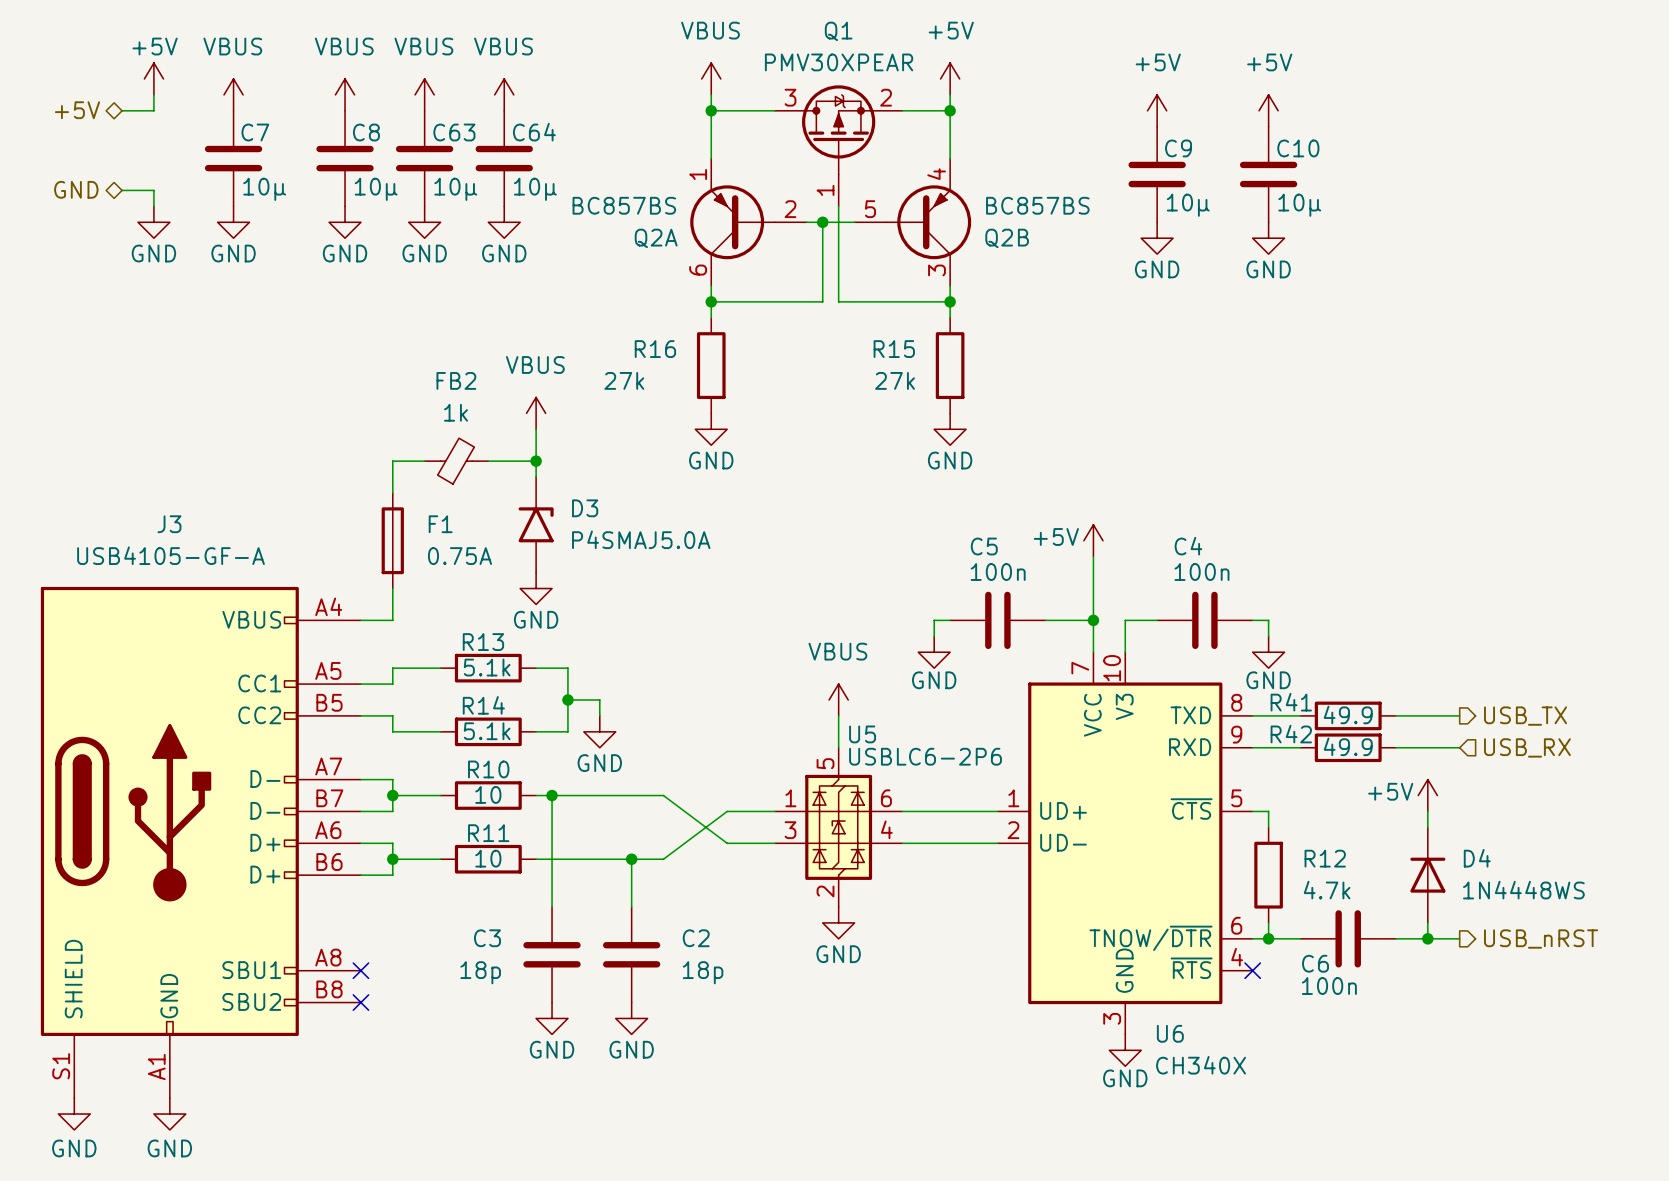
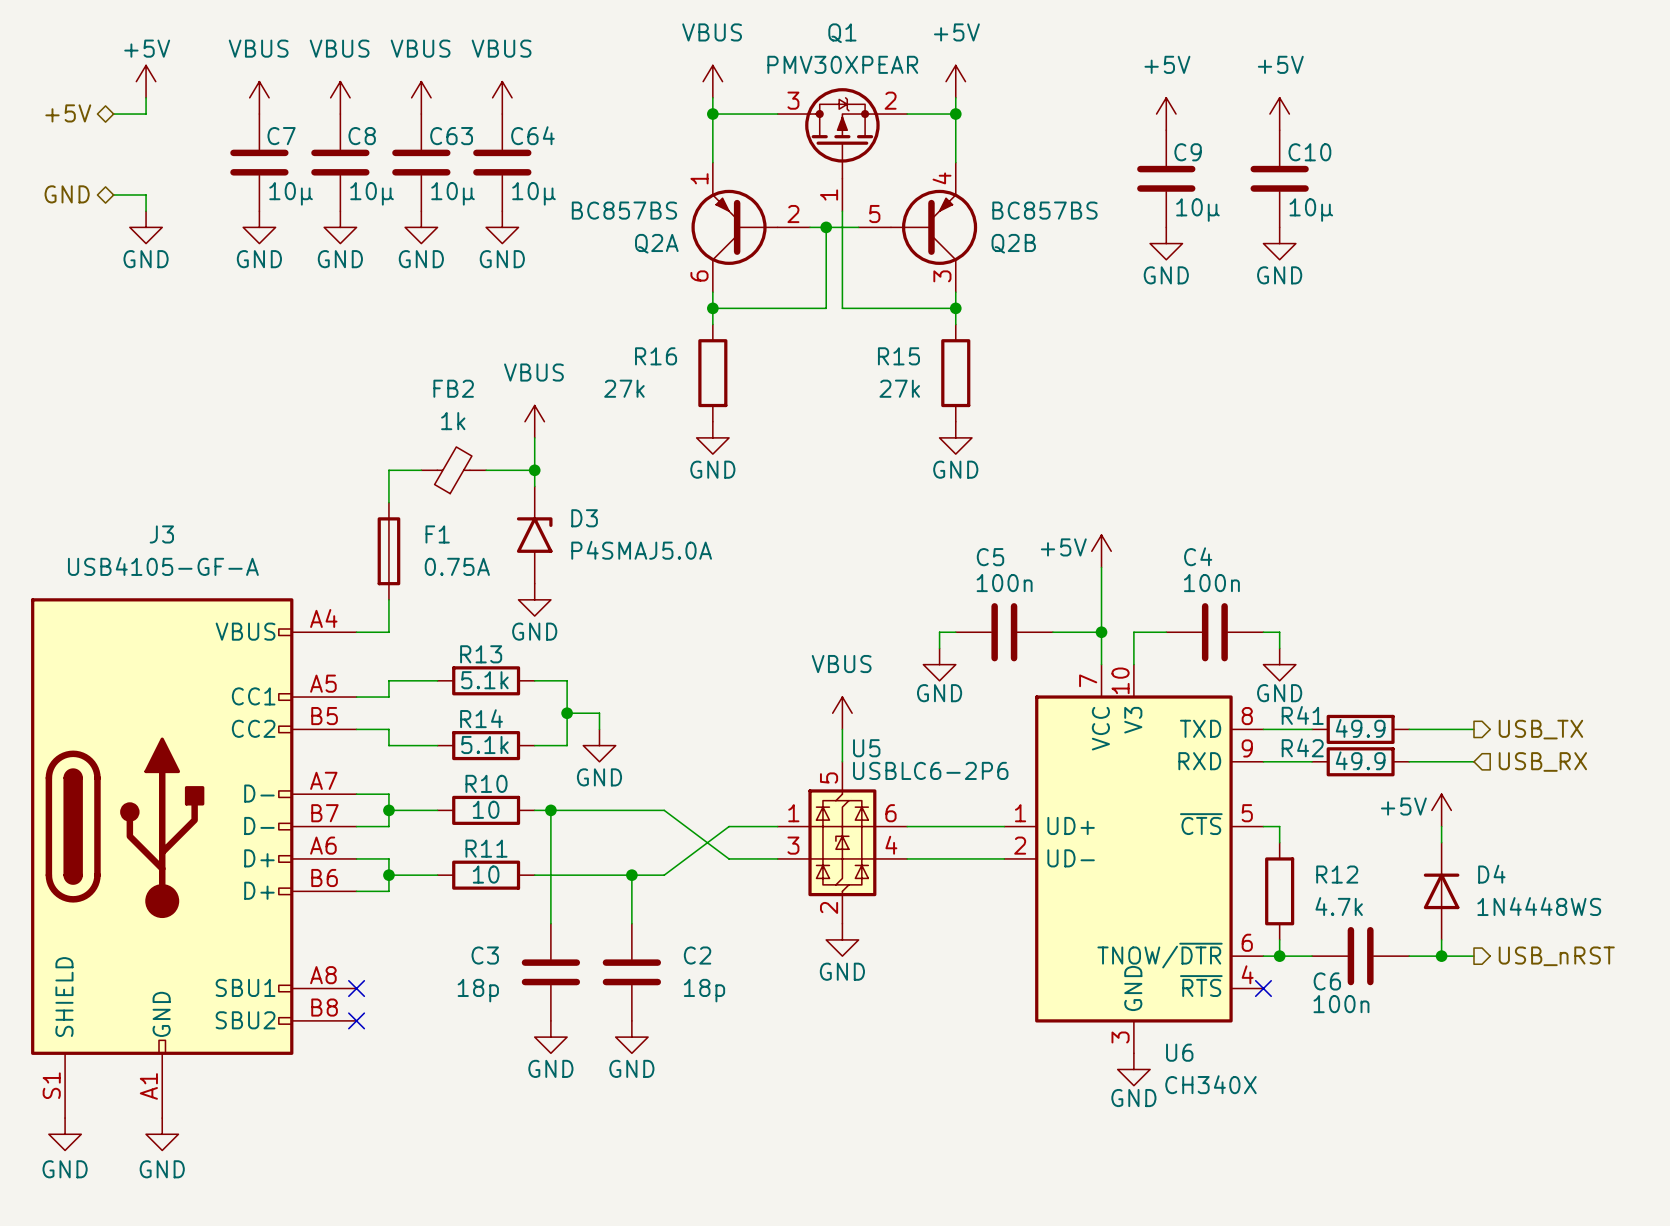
power symbol position: VBUS (233, 94) -> VBUS (259, 97)
C7 position: (233, 158) -> (259, 162)
power symbol position: GND (233, 222) -> GND (259, 227)

